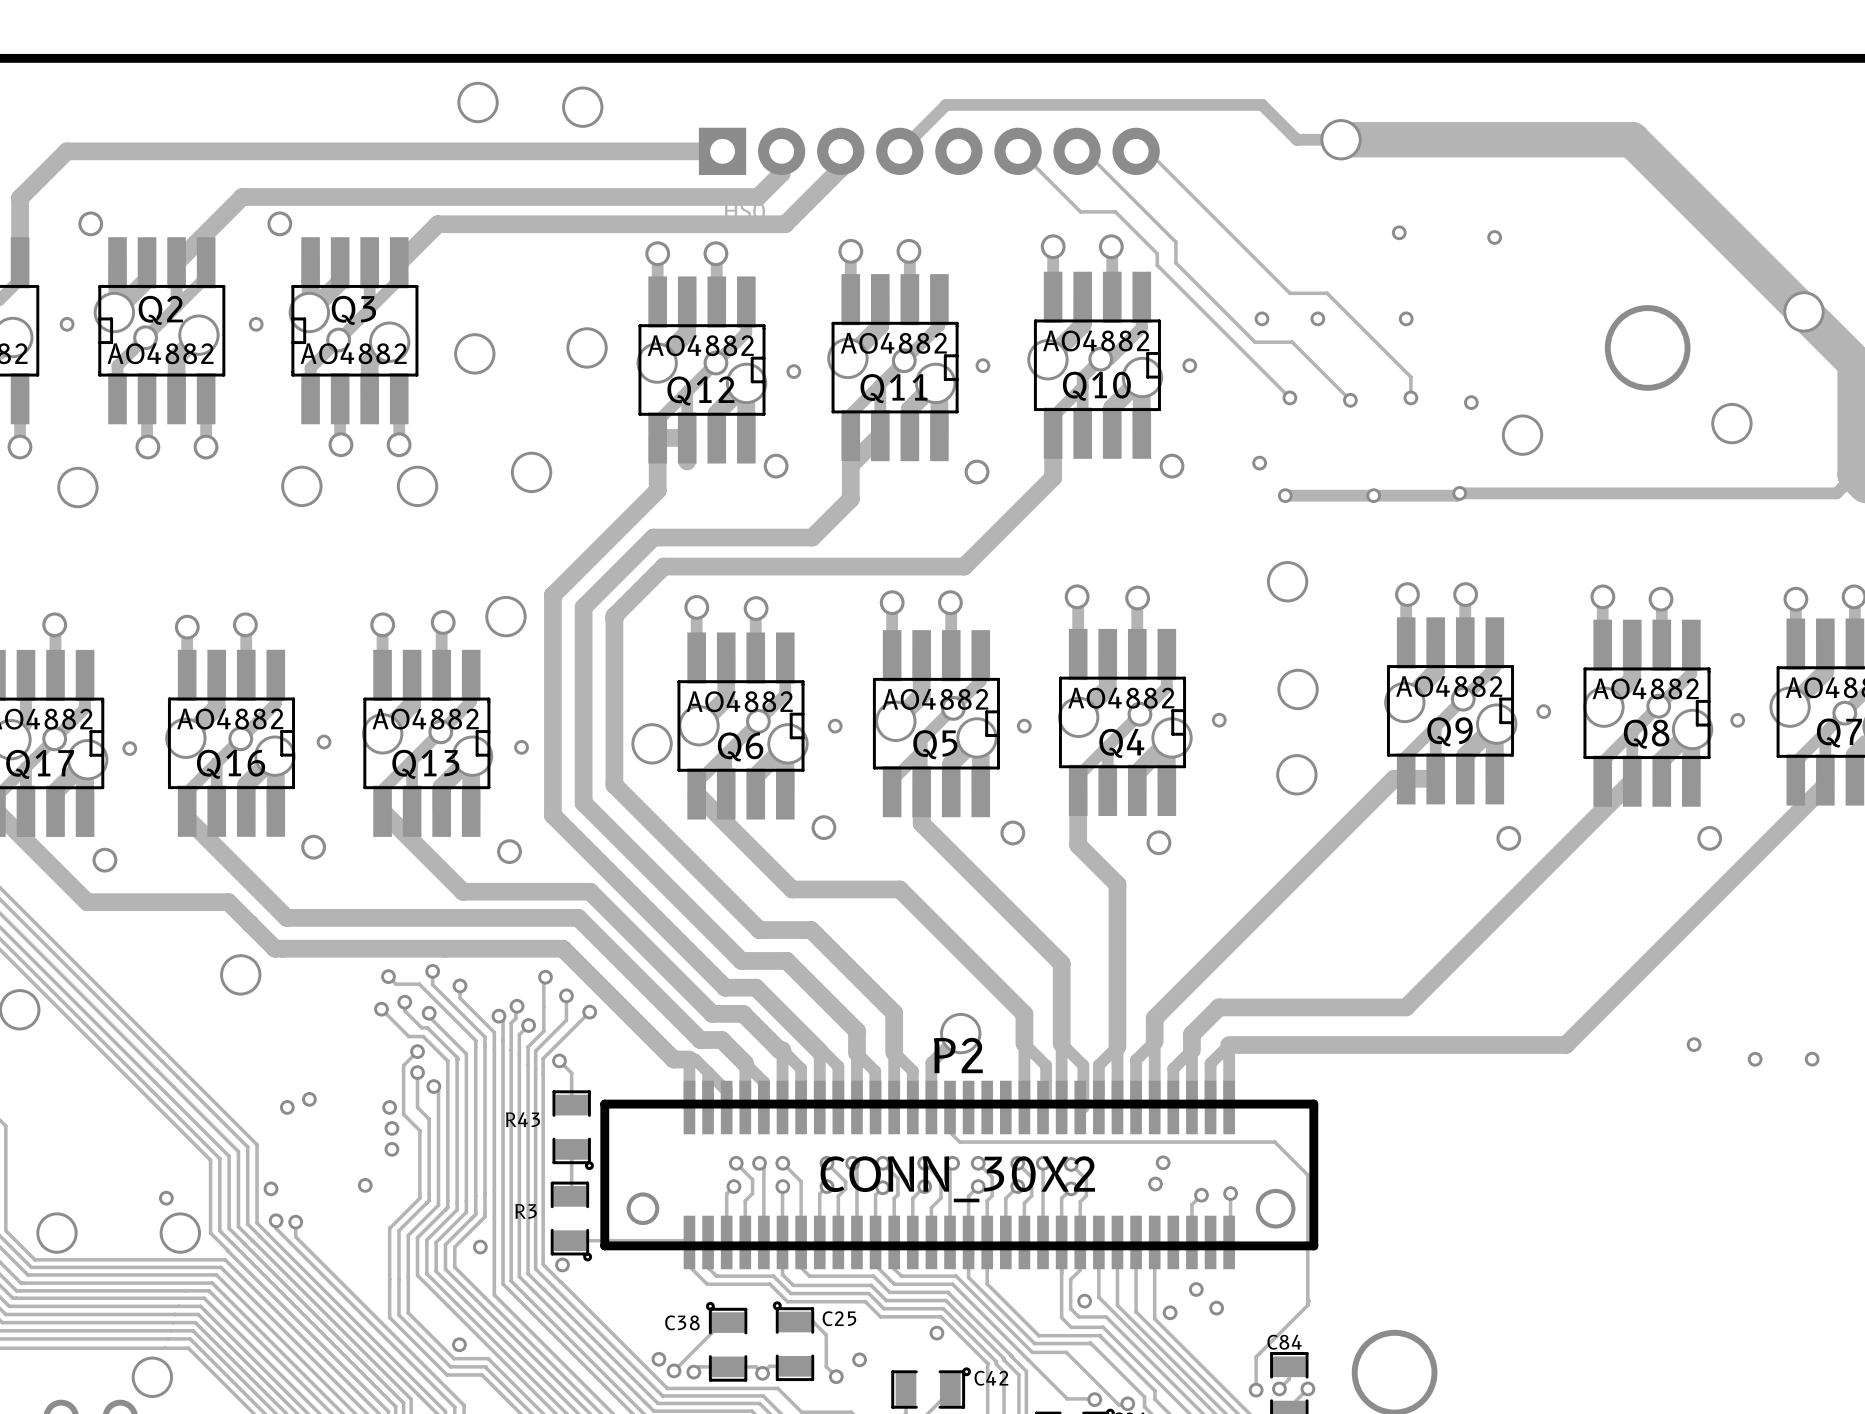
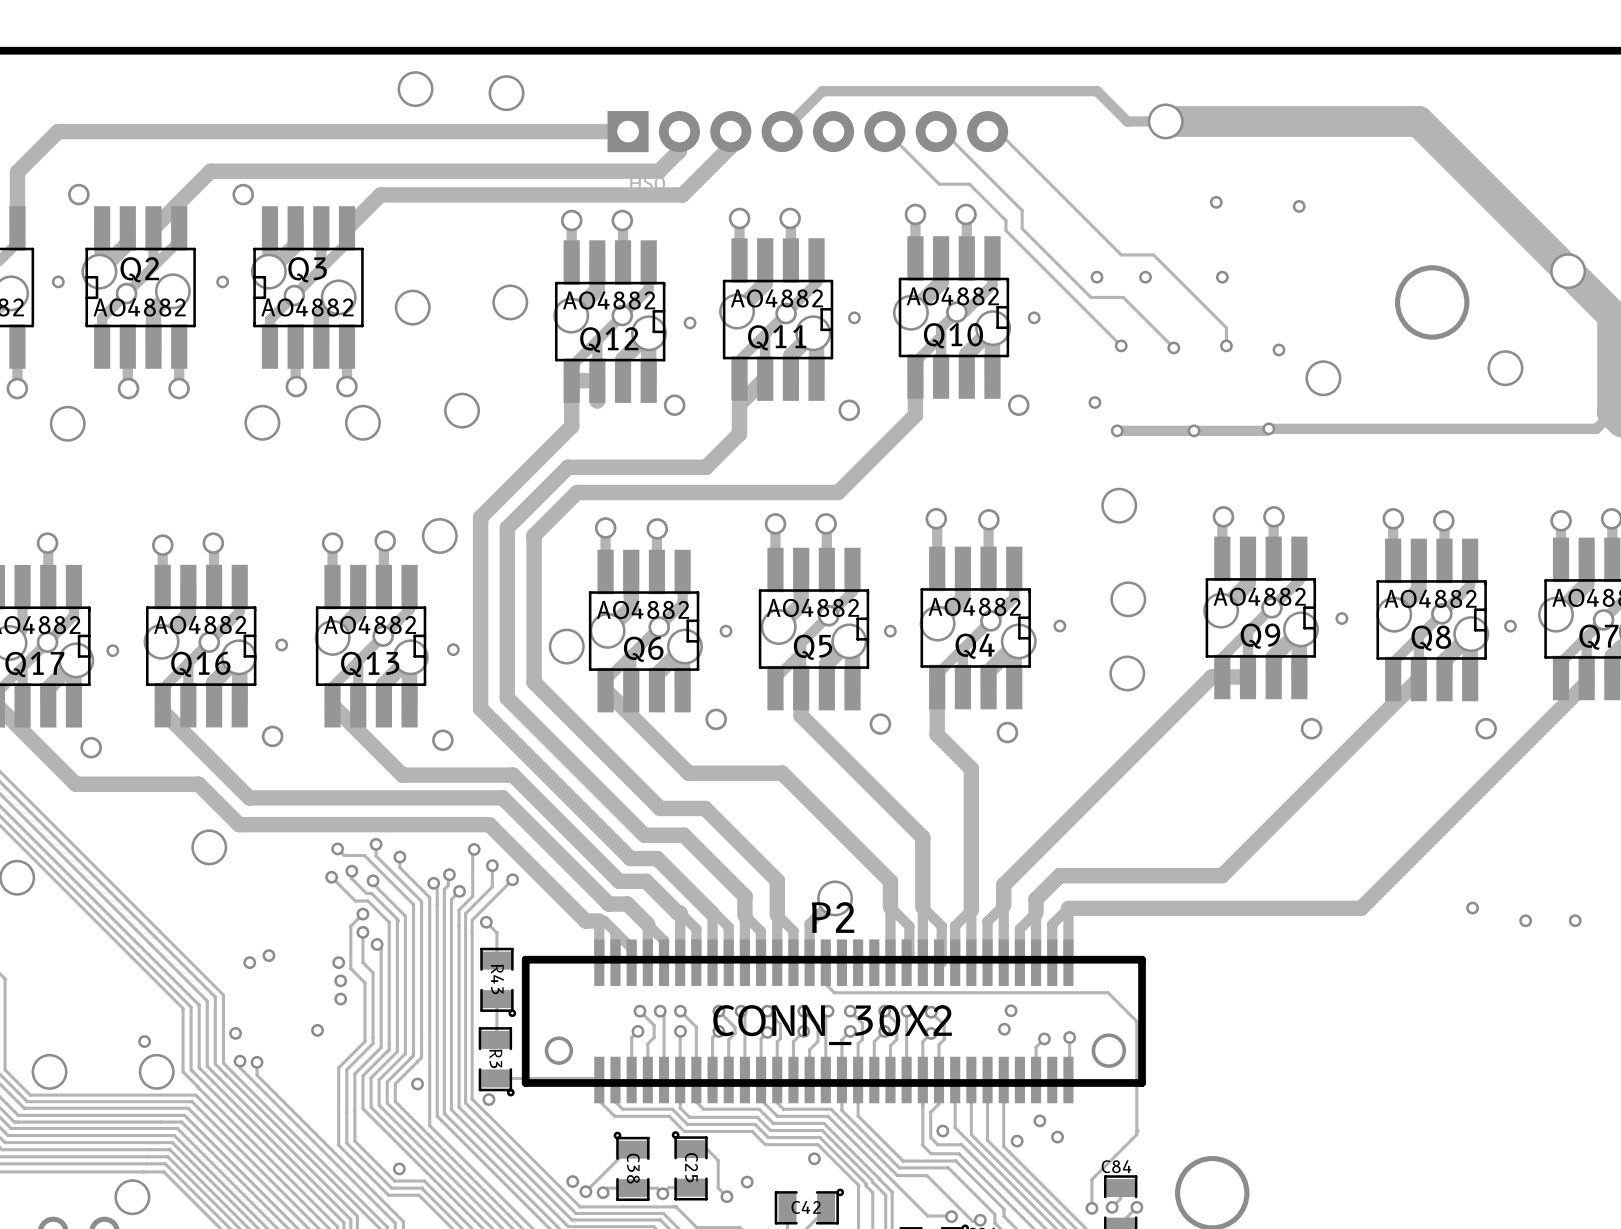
R43 name rotation: 0° (523, 1119) -> 90° clockwise (497, 979)
R3 name rotation: 0° (526, 1211) -> 90° clockwise (495, 1058)
R3 name position: R3 (526, 1211) -> R3 (495, 1058)
C25 name rotation: 0° (839, 1318) -> 90° clockwise (691, 1167)
C25 name position: C25 (839, 1318) -> C25 (691, 1167)
C38 name rotation: 0° (682, 1322) -> 90° clockwise (633, 1168)
C42 name position: C42 (991, 1378) -> C42 (806, 1207)

